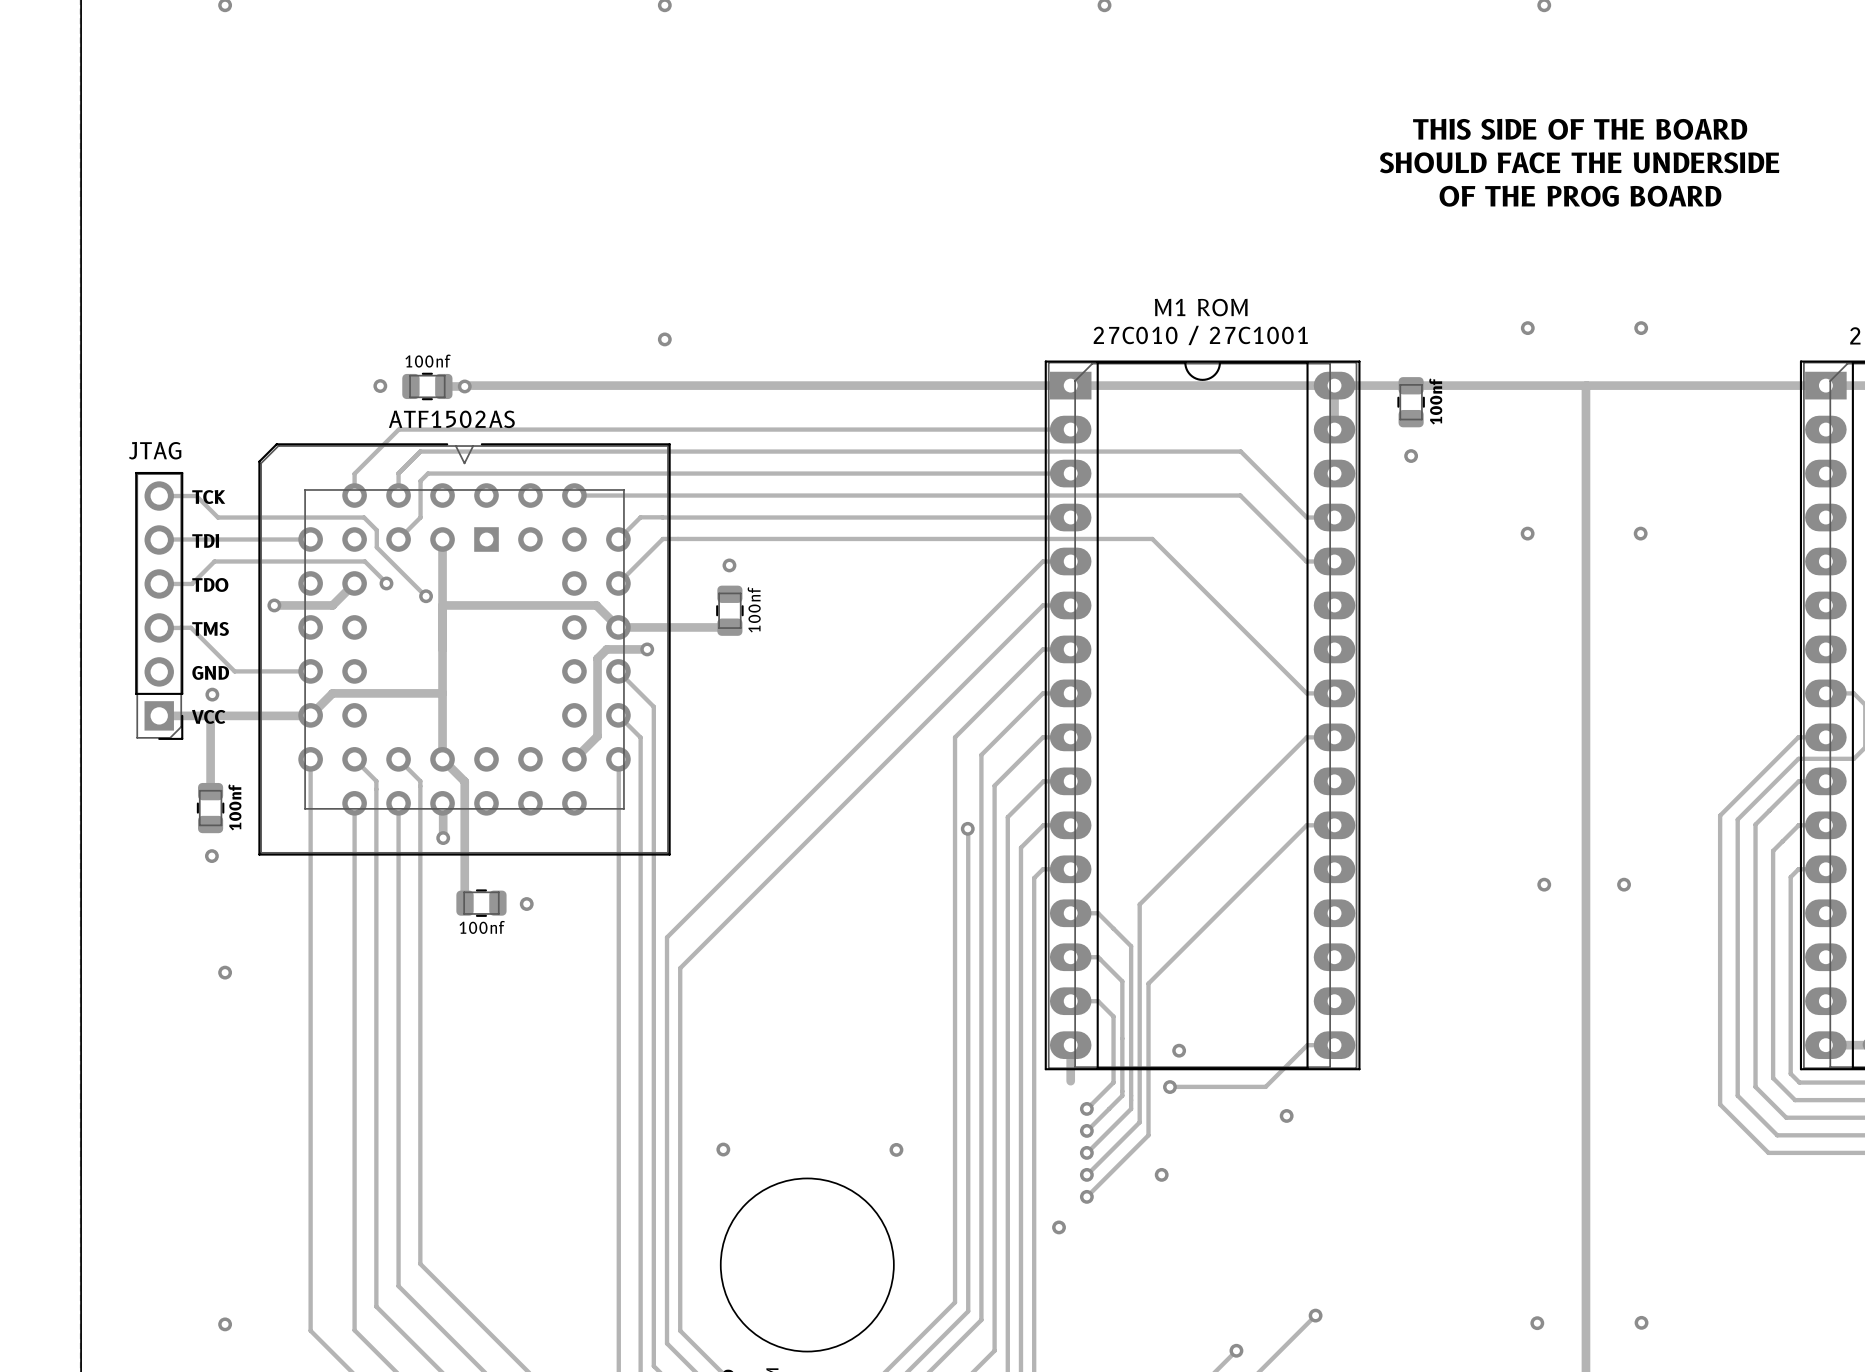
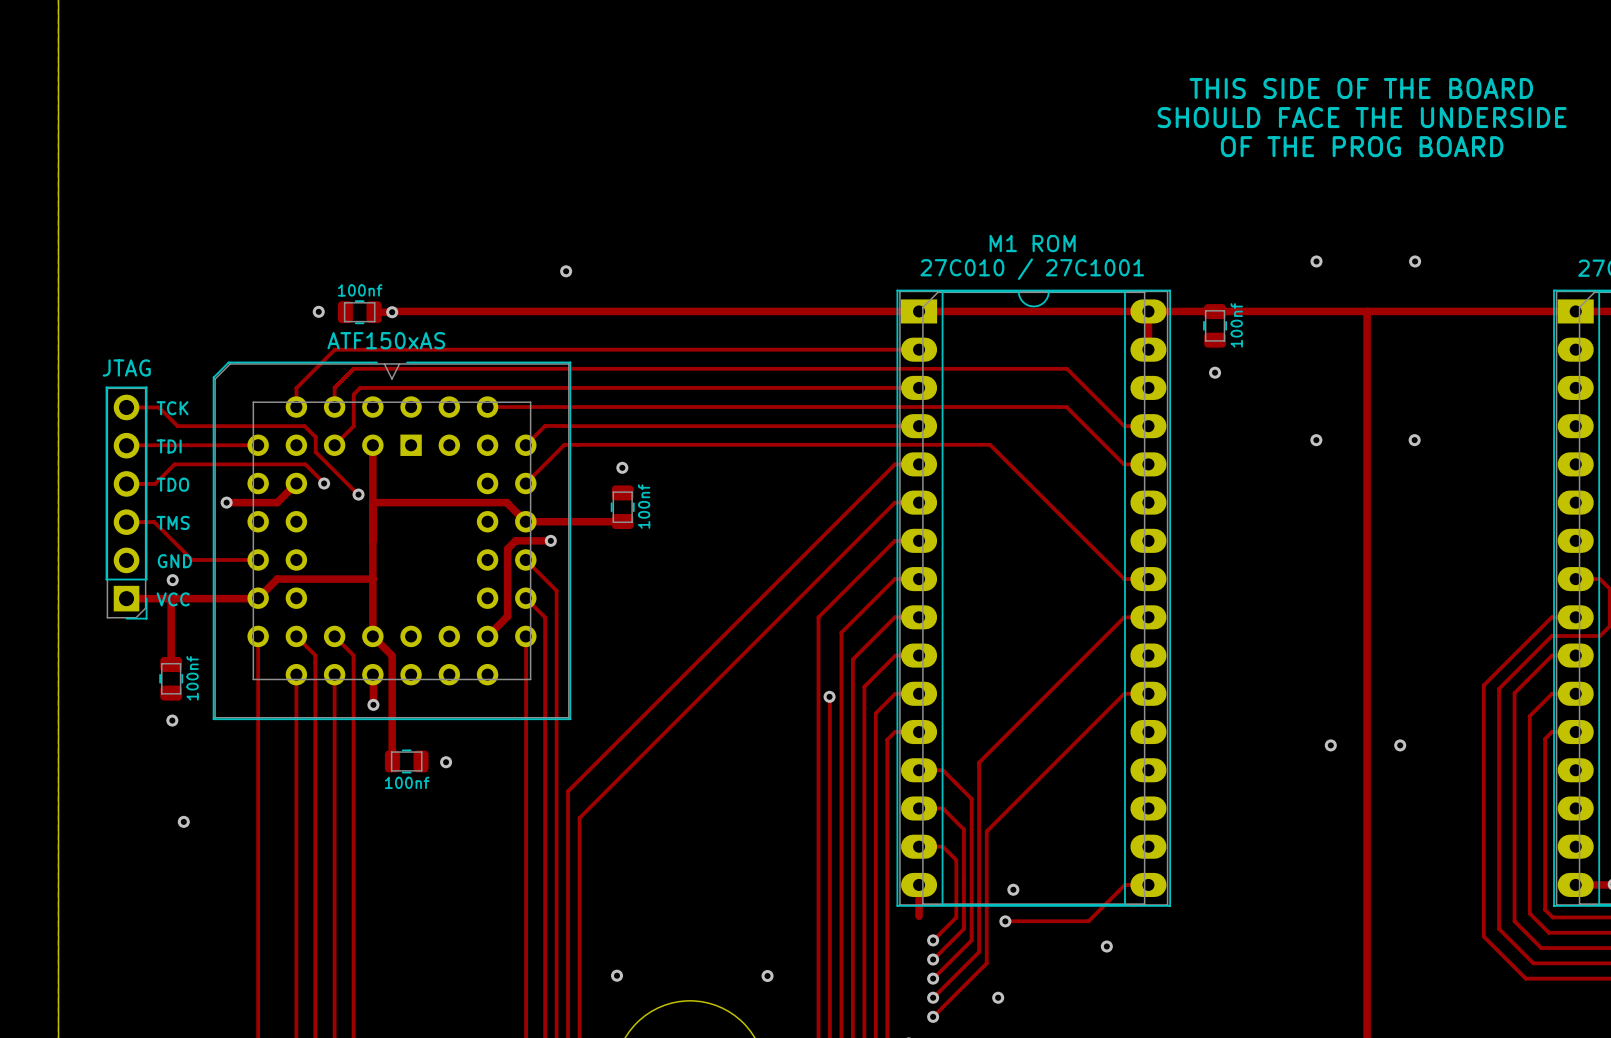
text: ATF1502AS (451, 419) -> ATF150xAS (386, 340)

